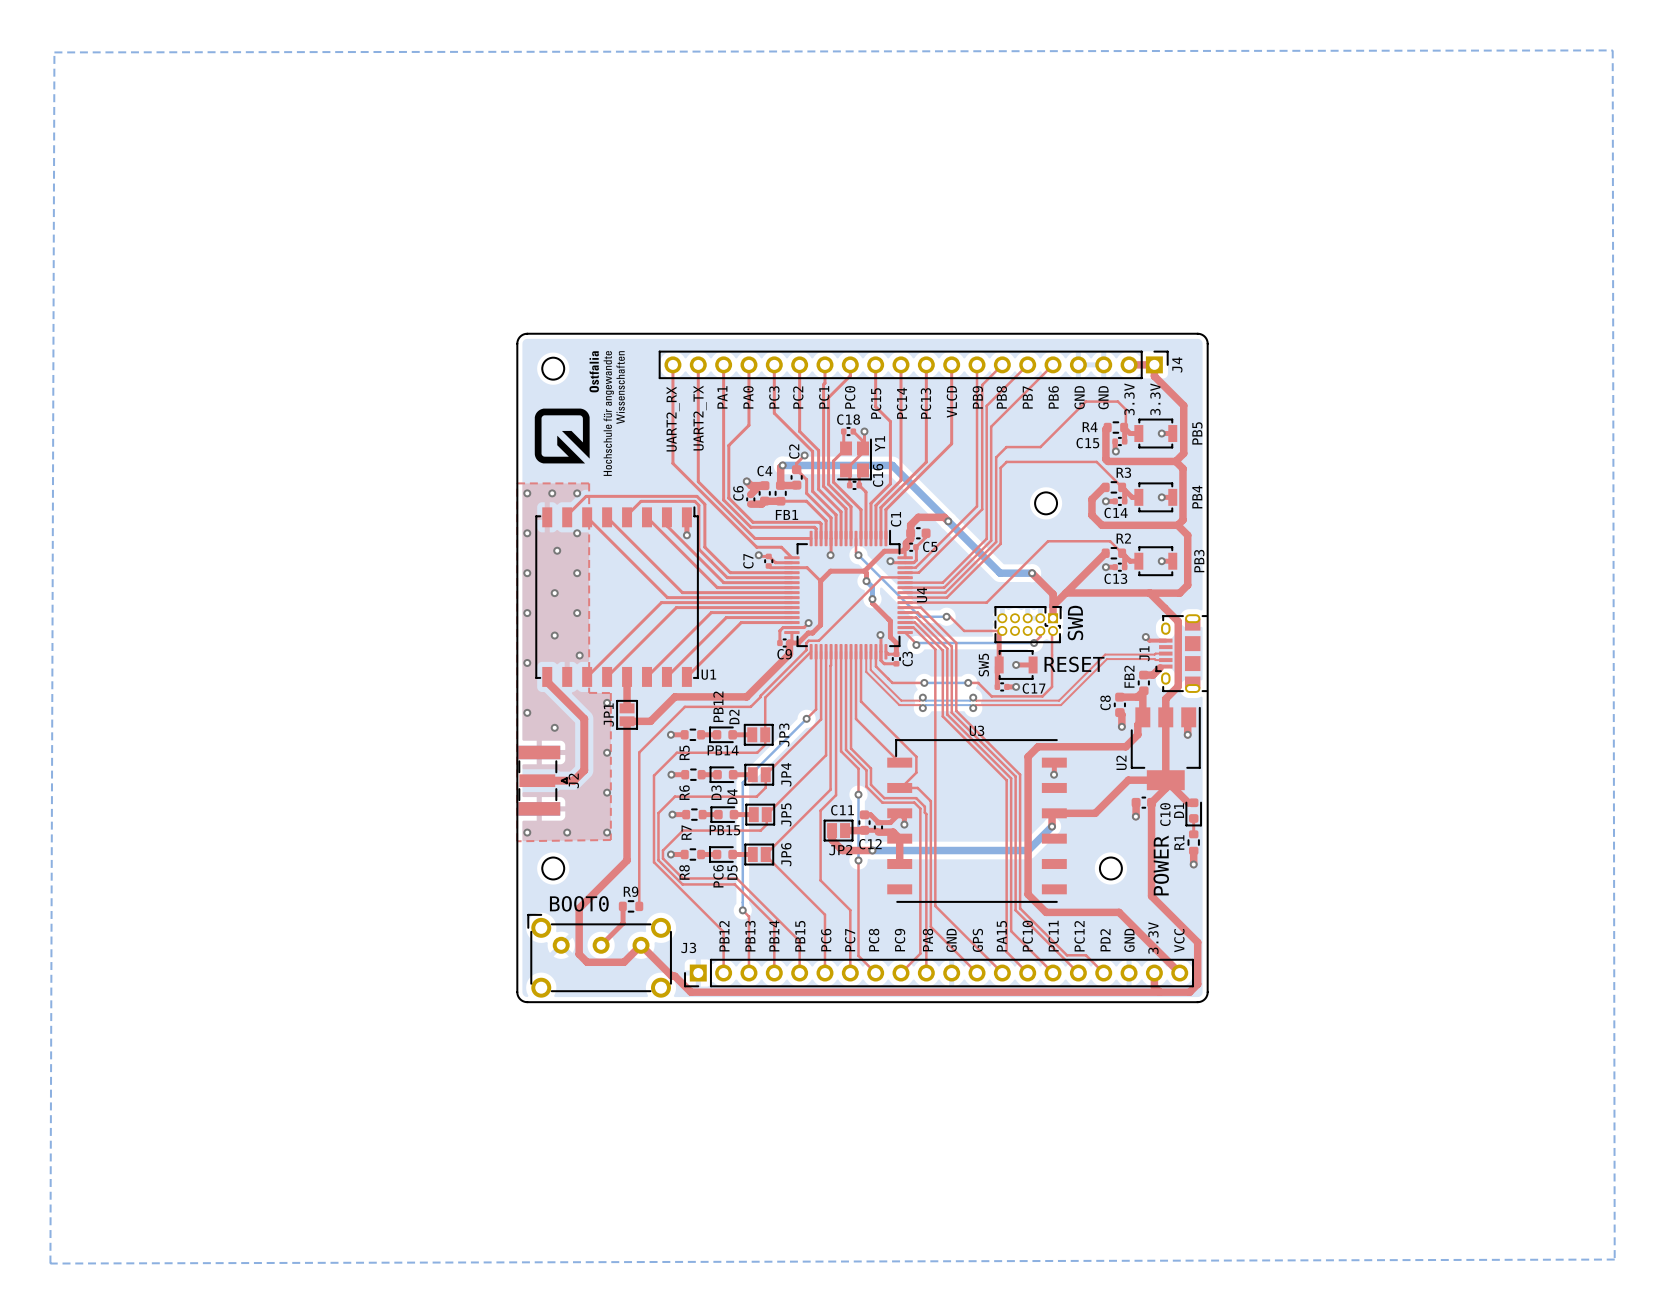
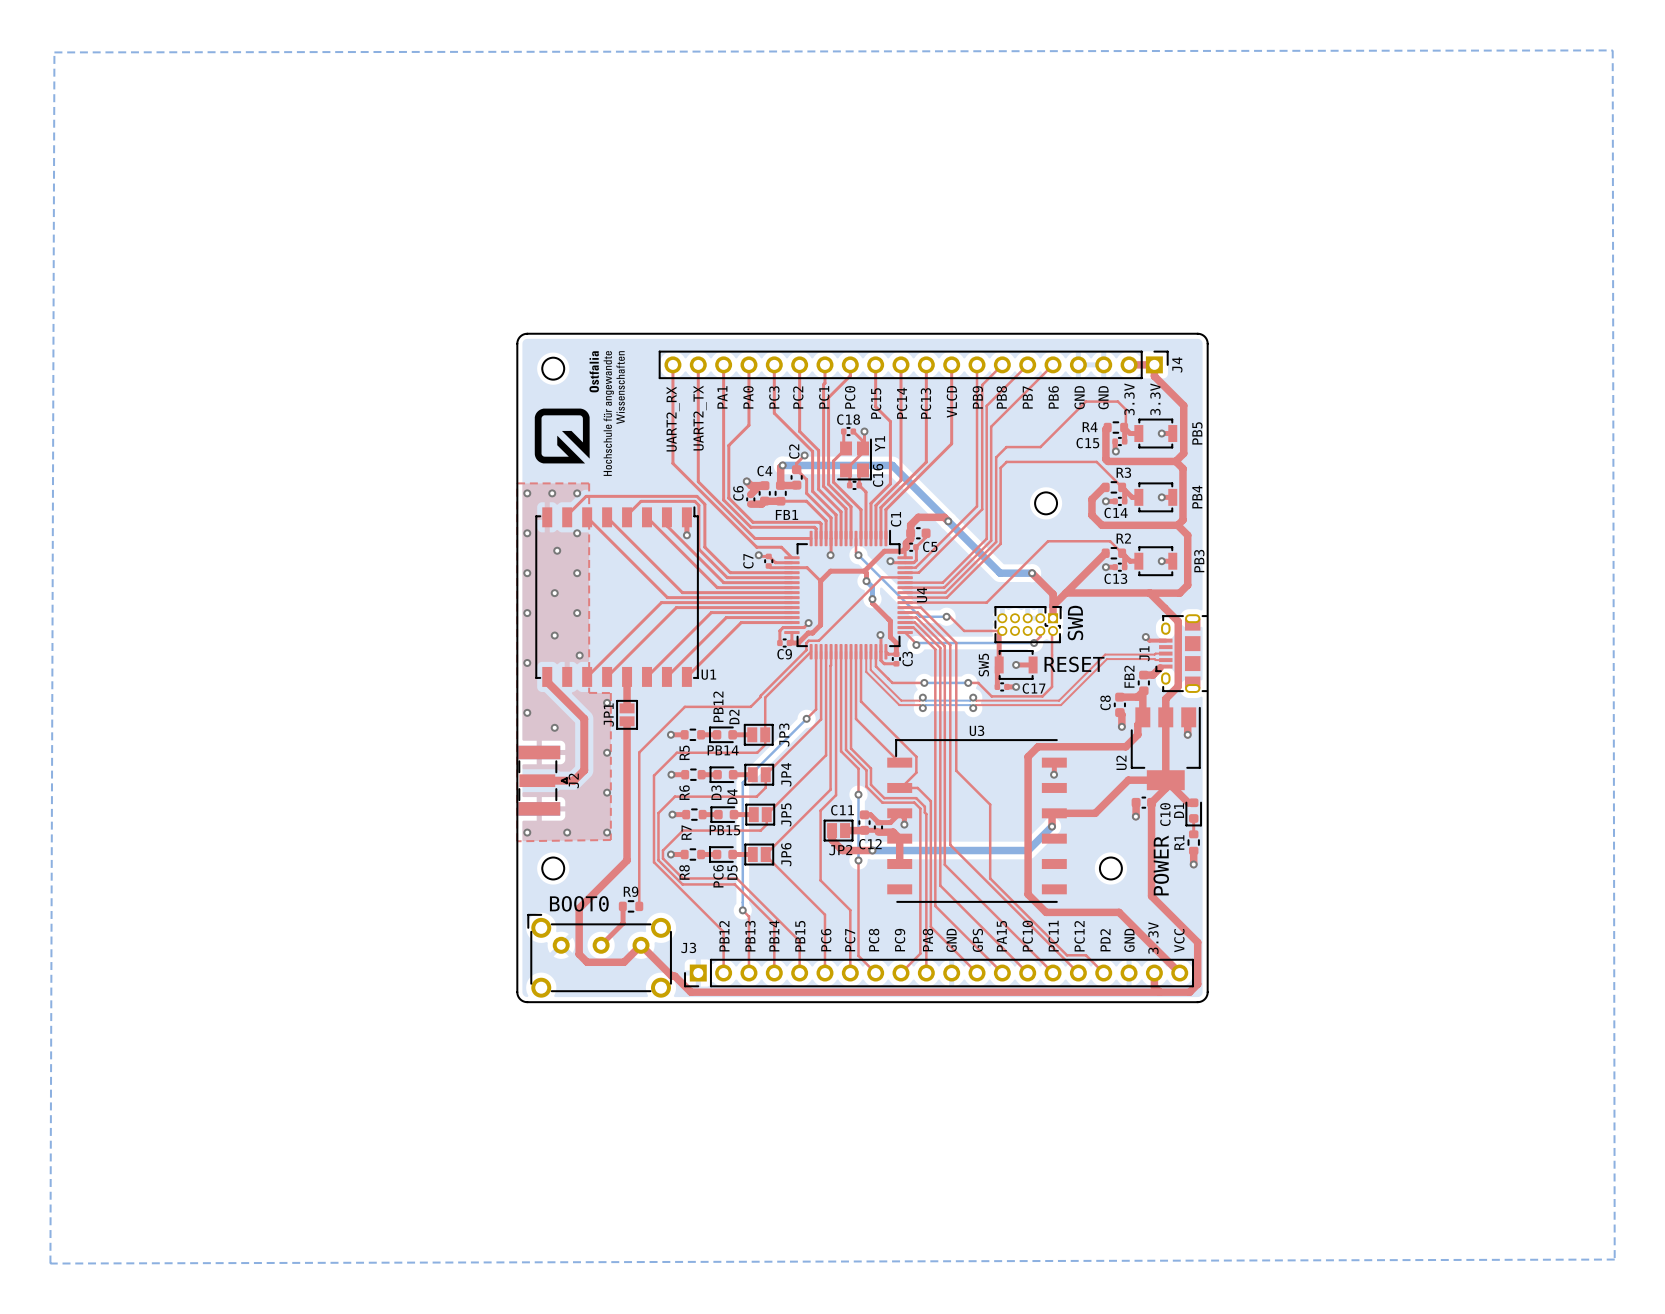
top track: (789, 643) (789, 654) (746, 696) (674, 696) (650, 721) (627, 721) -> none
top track: (950, 645) (951, 712) (1015, 776) (1015, 910) -> (950, 645) (950, 844) (1015, 910)
top track: (944, 646) (947, 648) (947, 714) (1011, 778) (1011, 931) -> (944, 646) (944, 864) (1011, 931)
top track: (940, 647) (942, 650) (942, 716) (1006, 780) (1006, 951) -> (940, 647) (940, 885) (1006, 951)
top track: (956, 710) (1020, 774) (1020, 908) -> (956, 710) (956, 770) (990, 804) (990, 878) (1020, 908)

